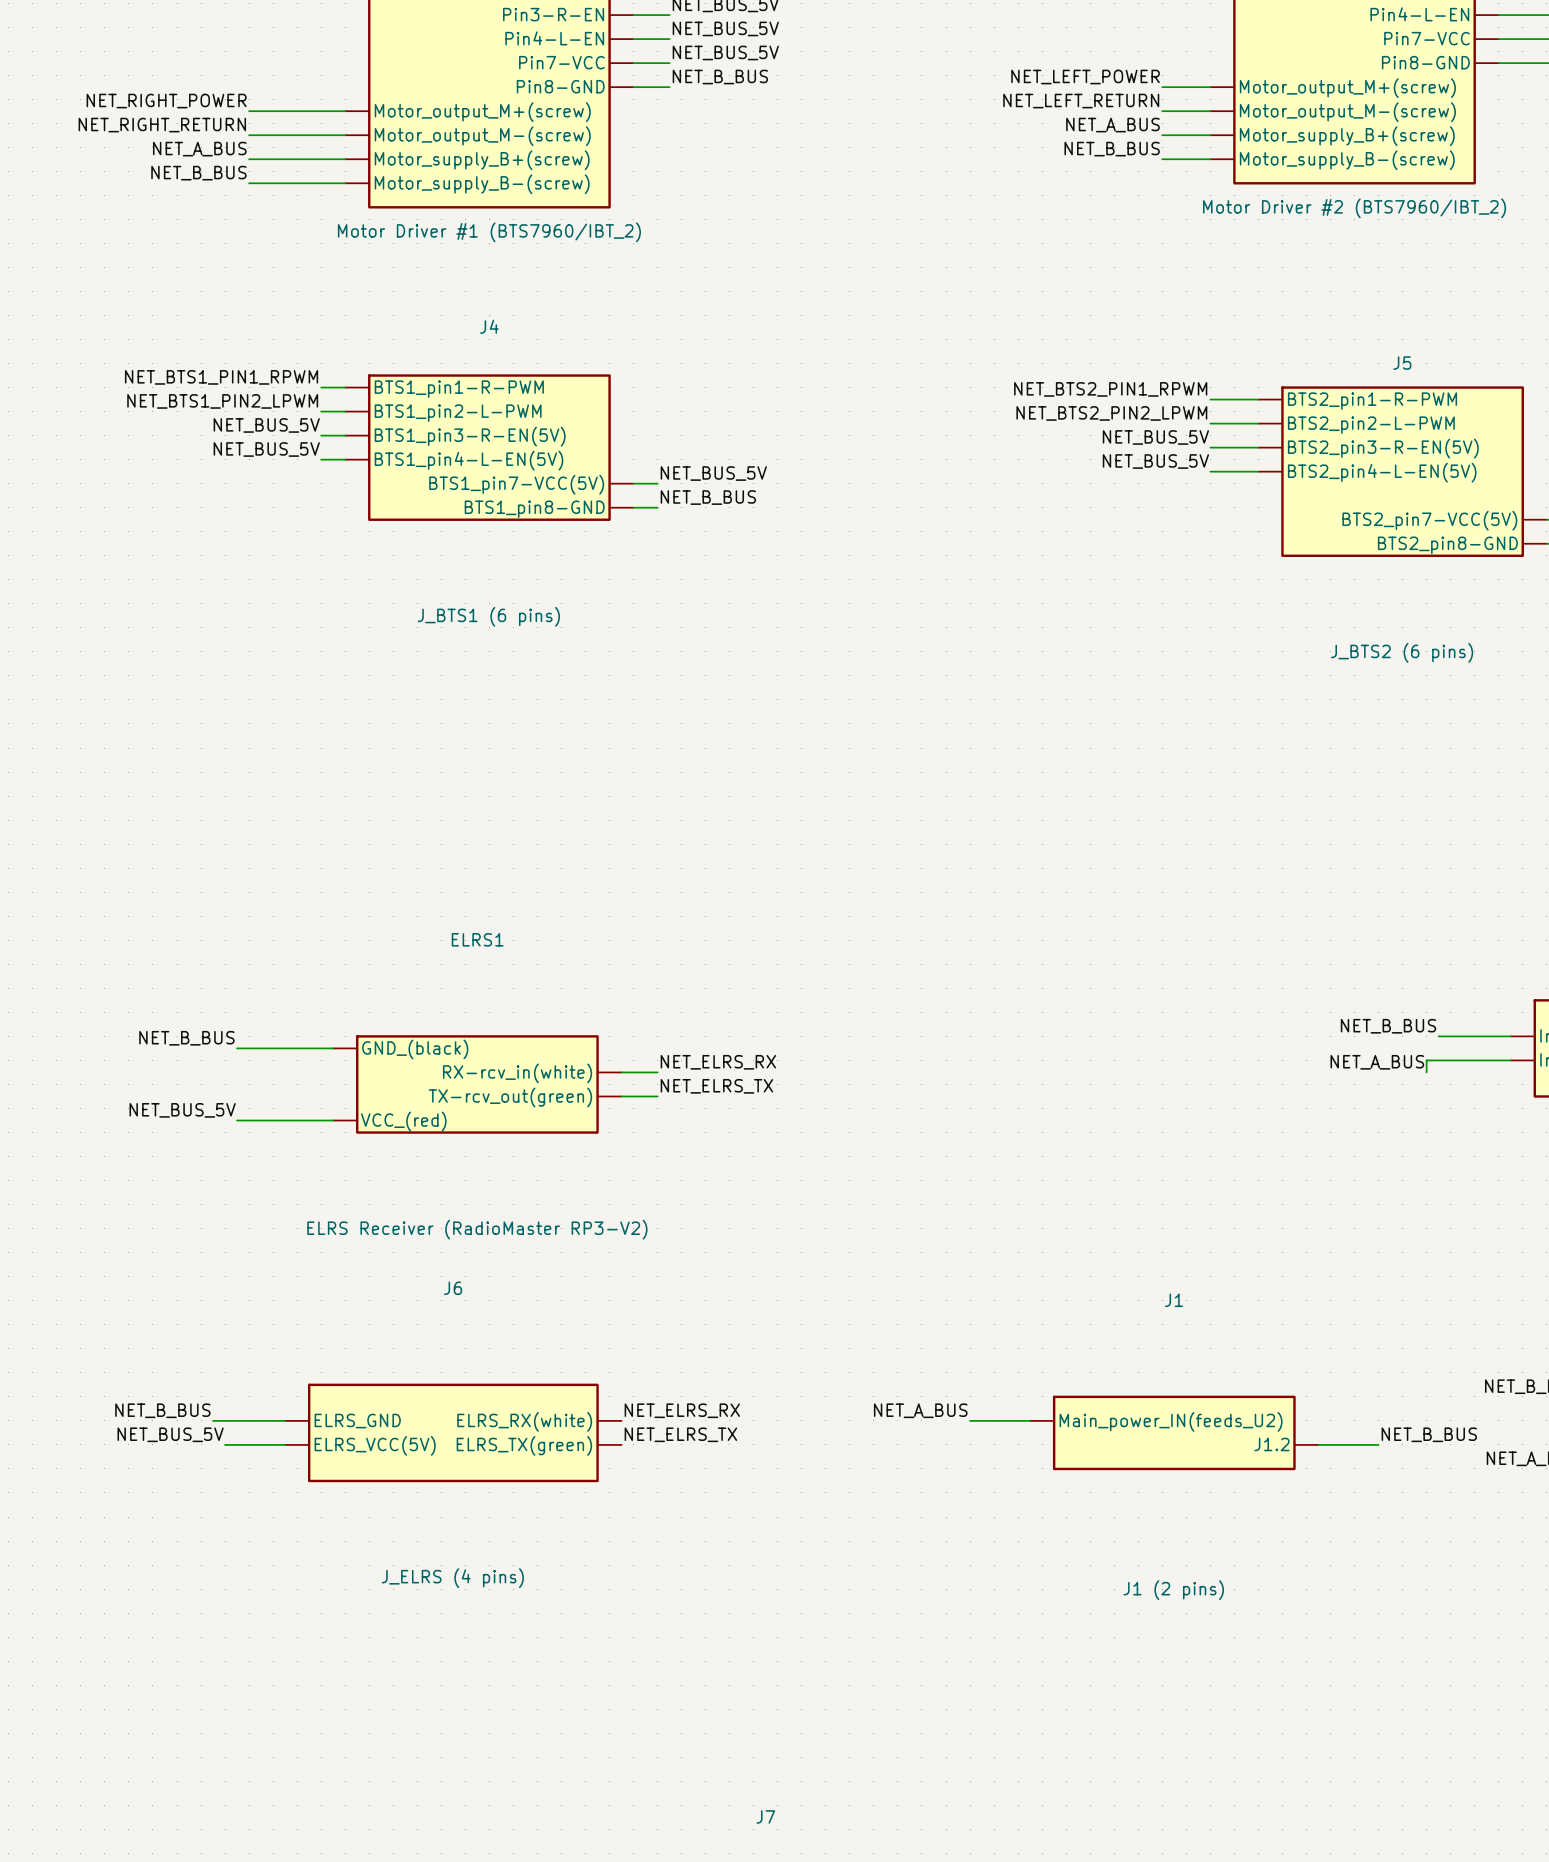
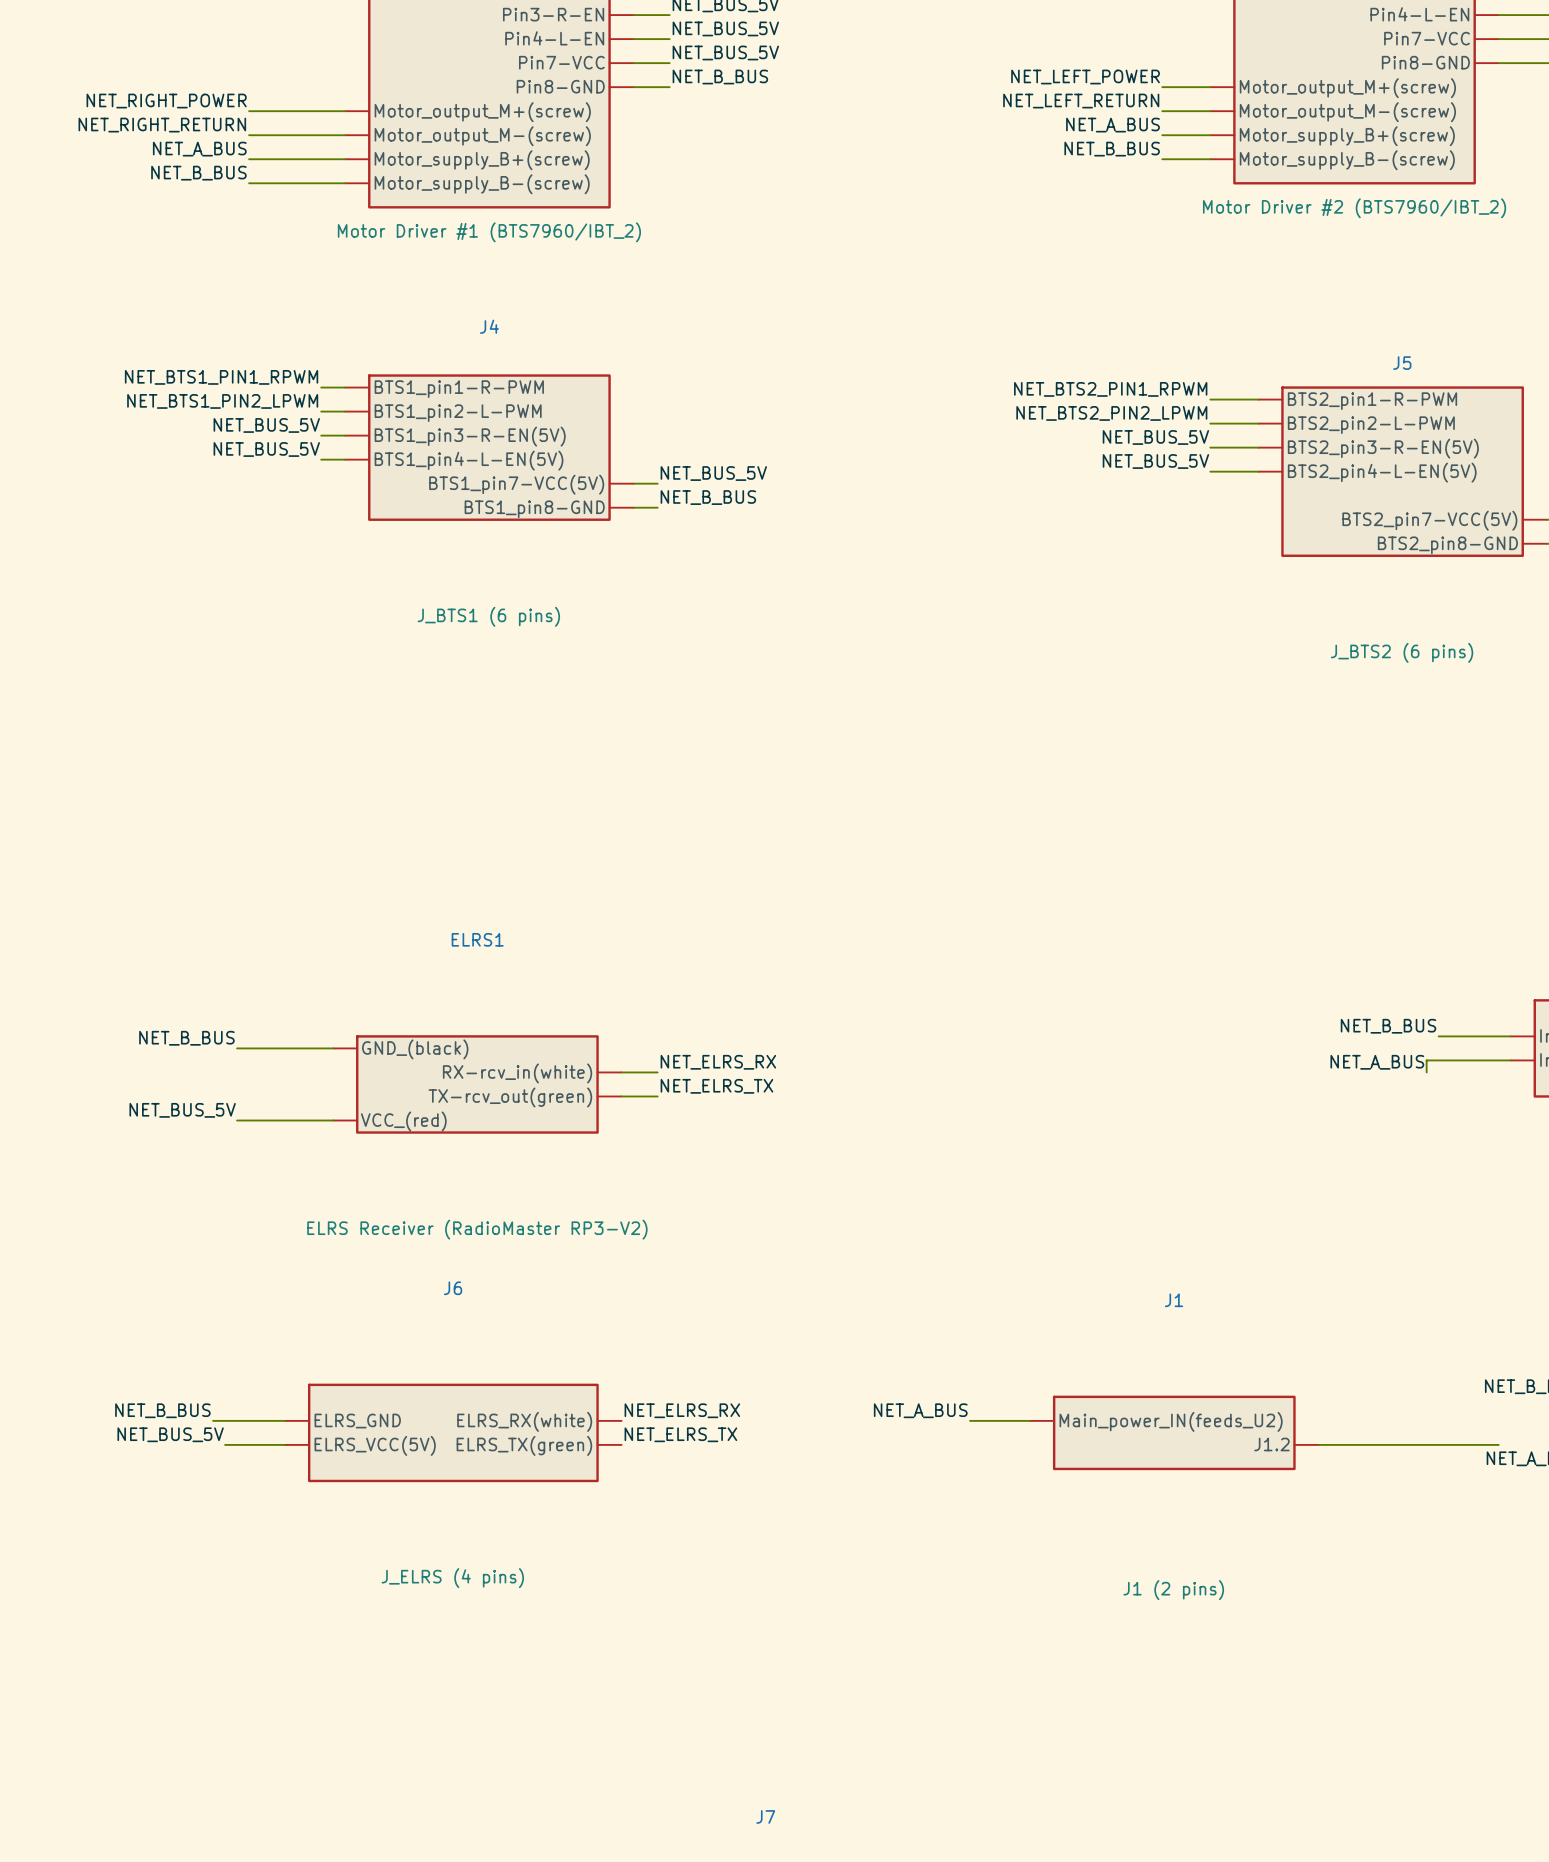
label: NET_B_BUS (1429, 1434) -> none
wire: none -> (1378, 1444) (1498, 1444)

